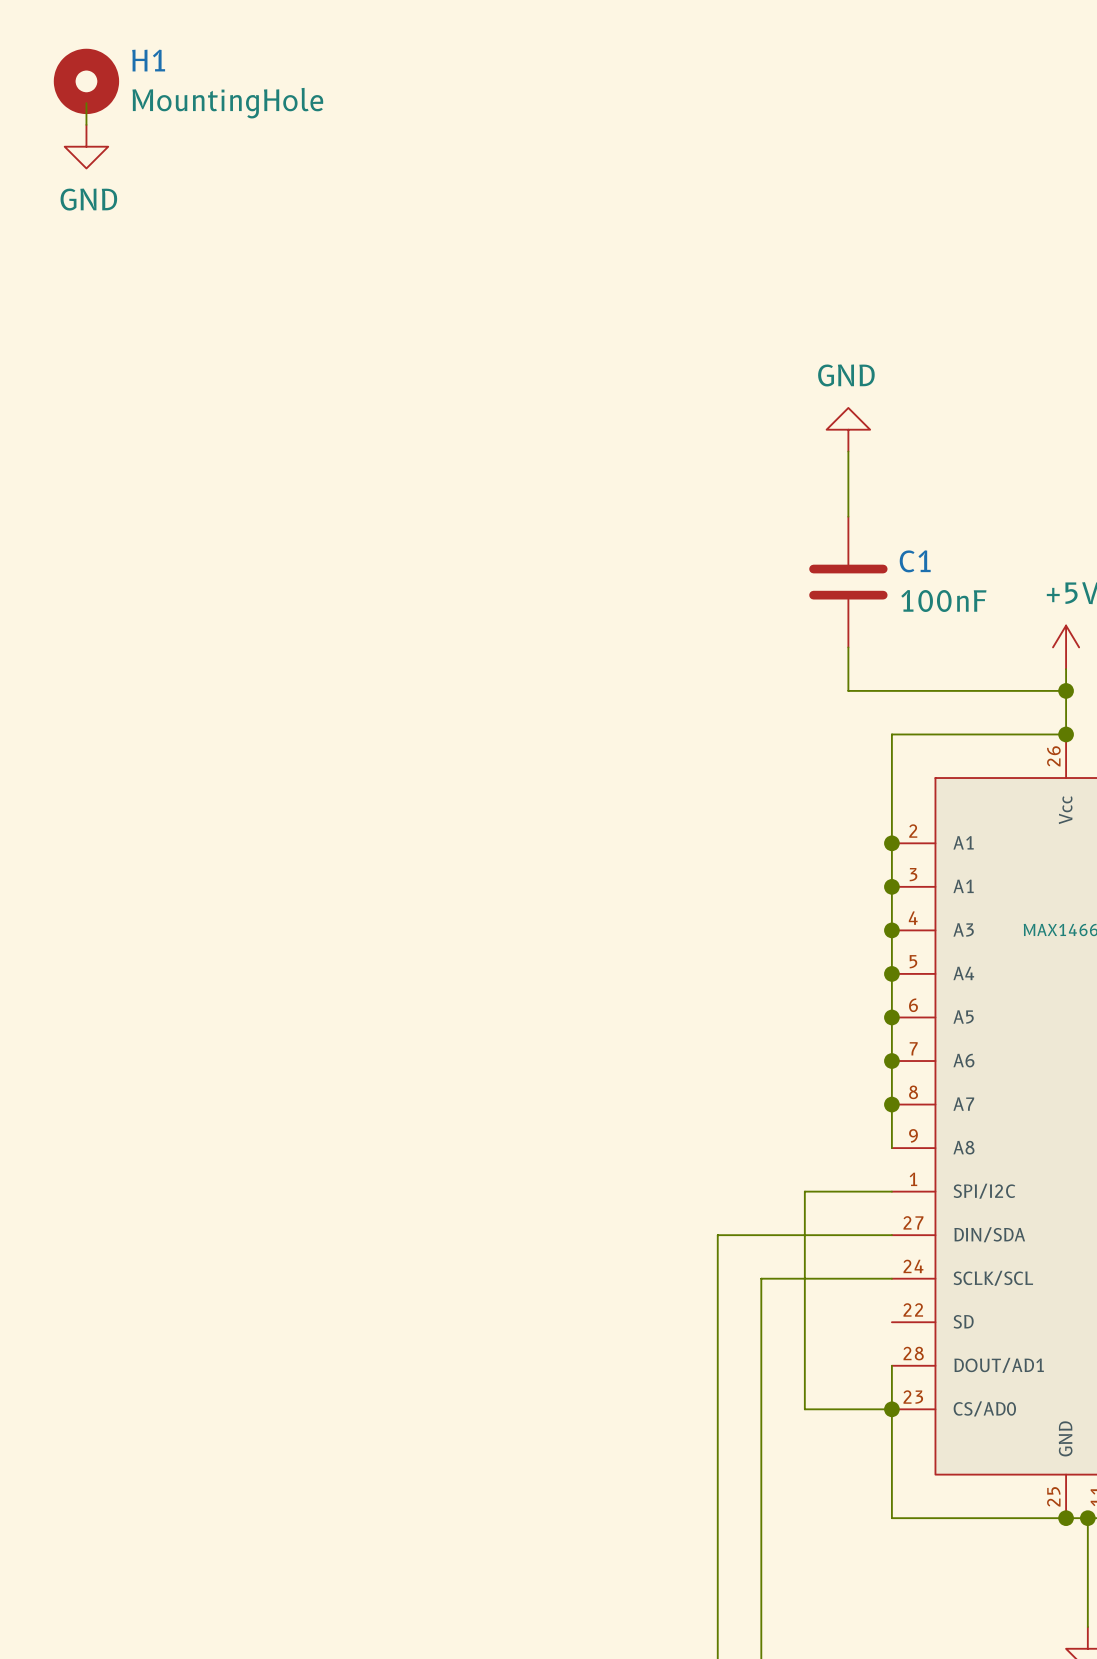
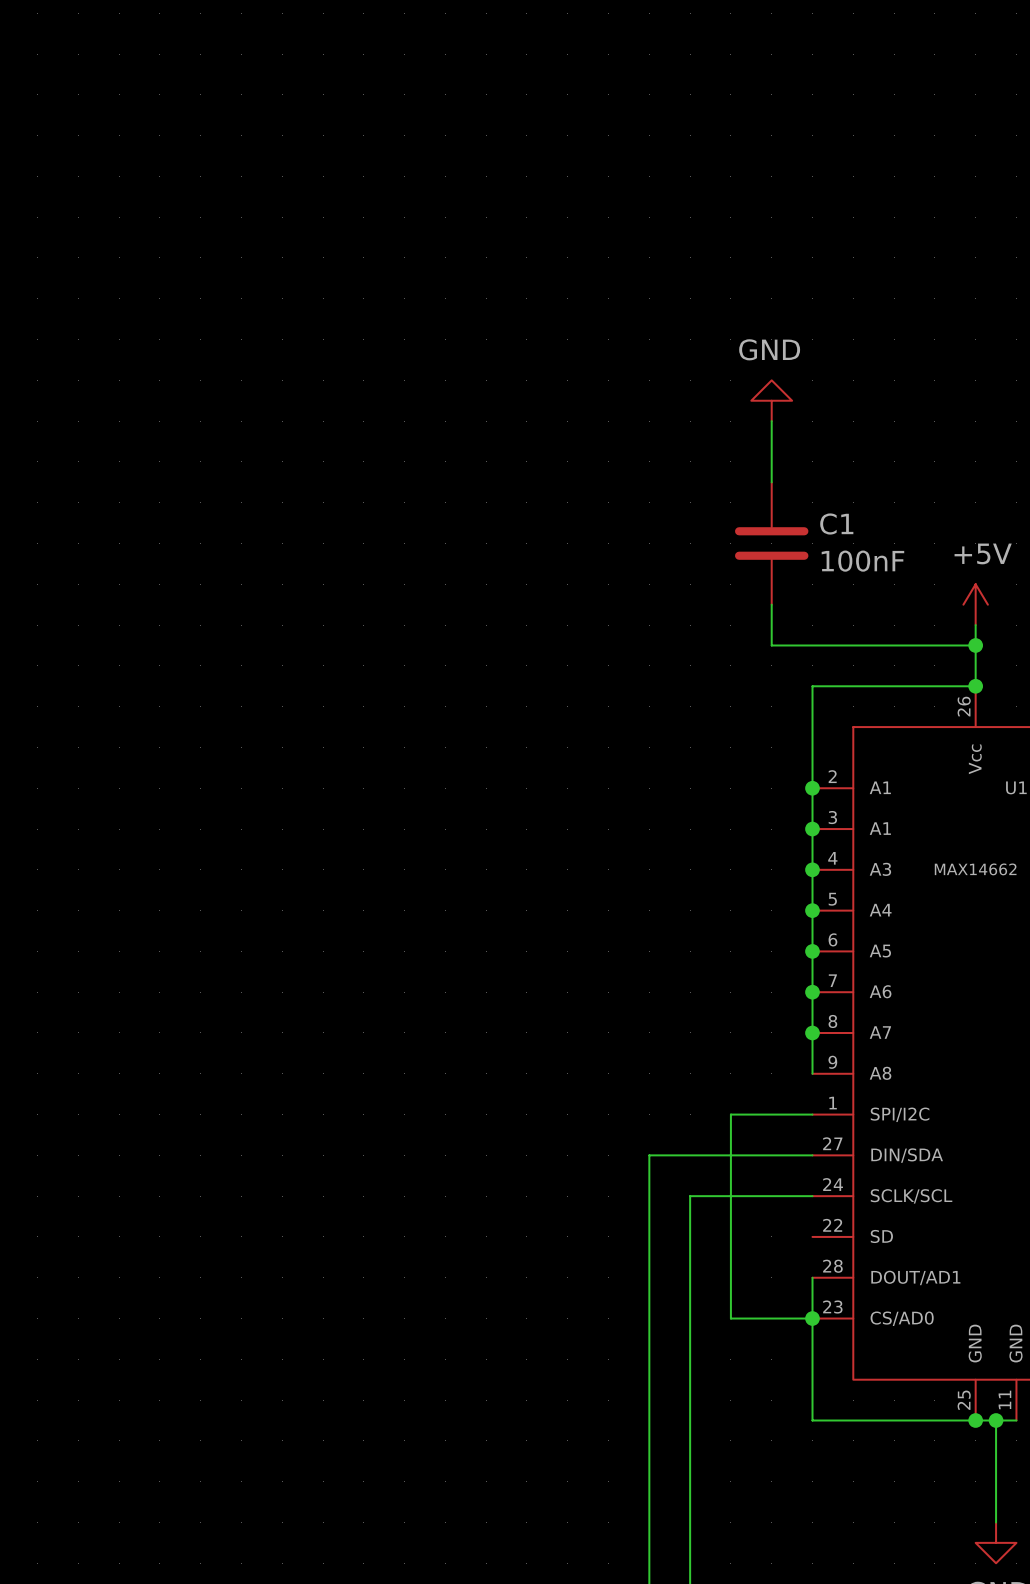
H1: MountingHole (86, 81) -> none
wire: (86, 103) (86, 124) -> none
power symbol: GND (86, 146) -> none

